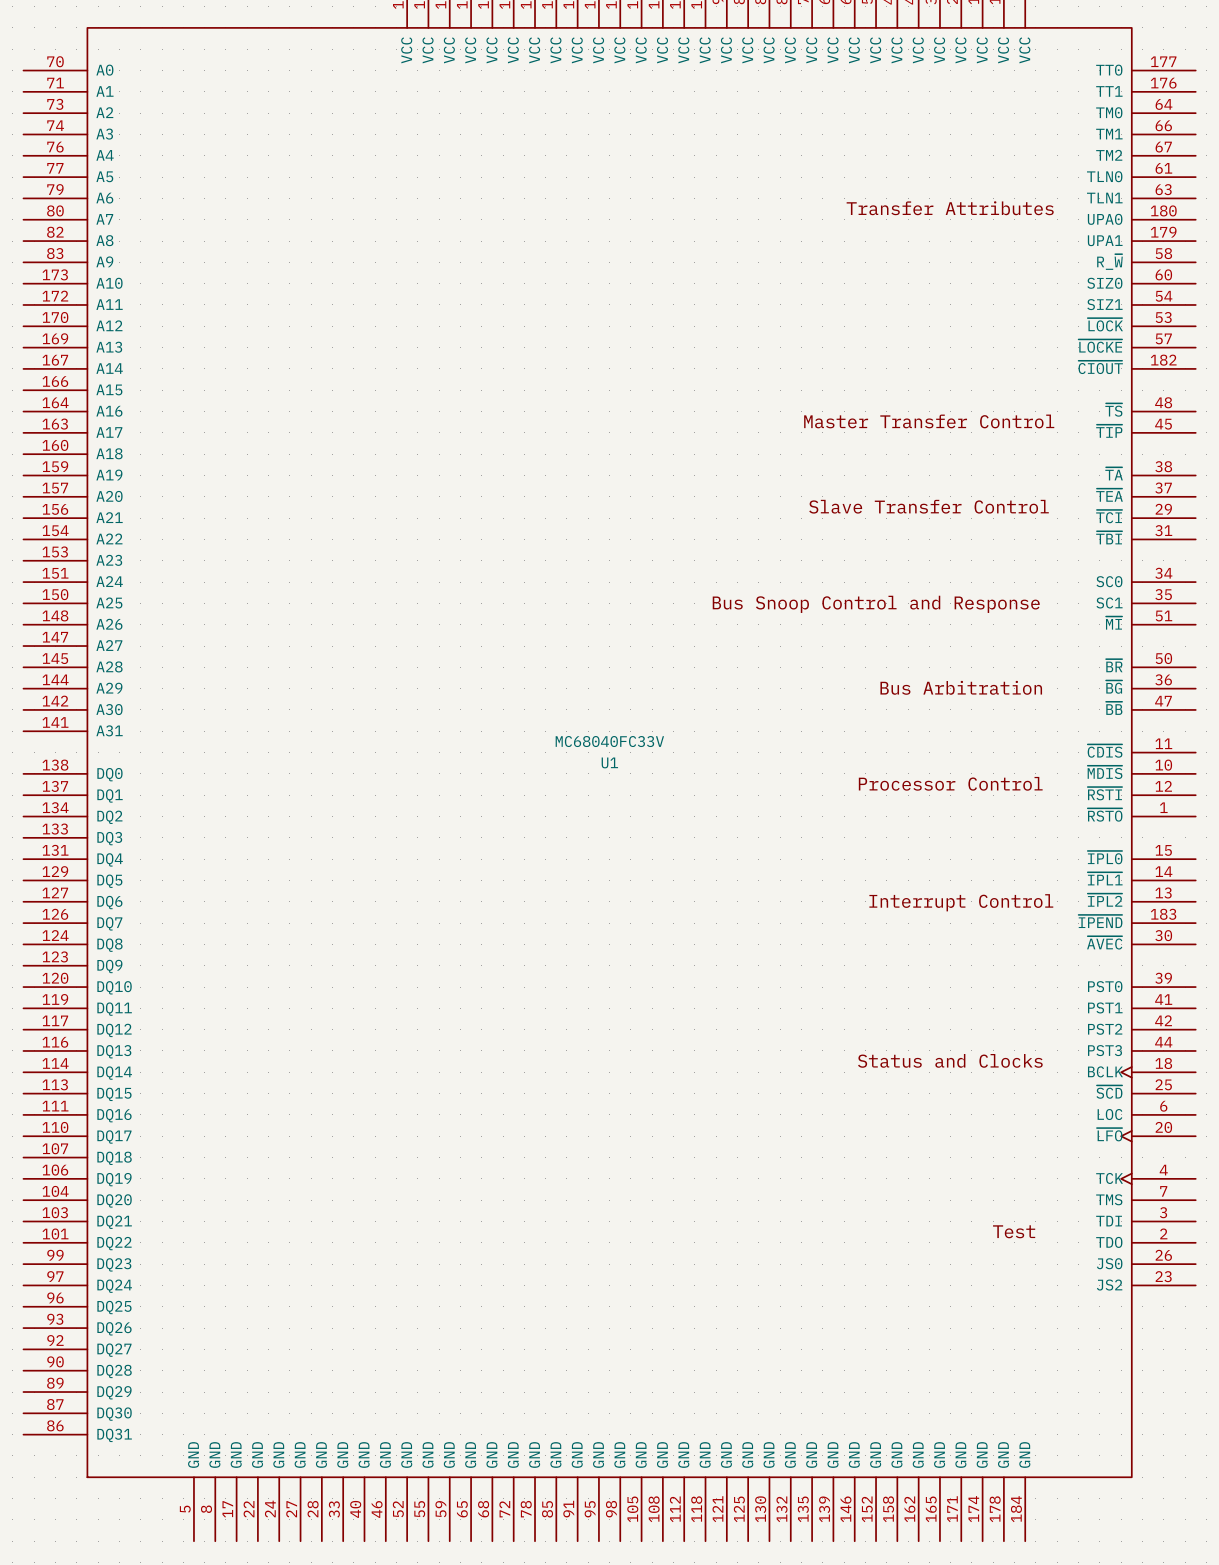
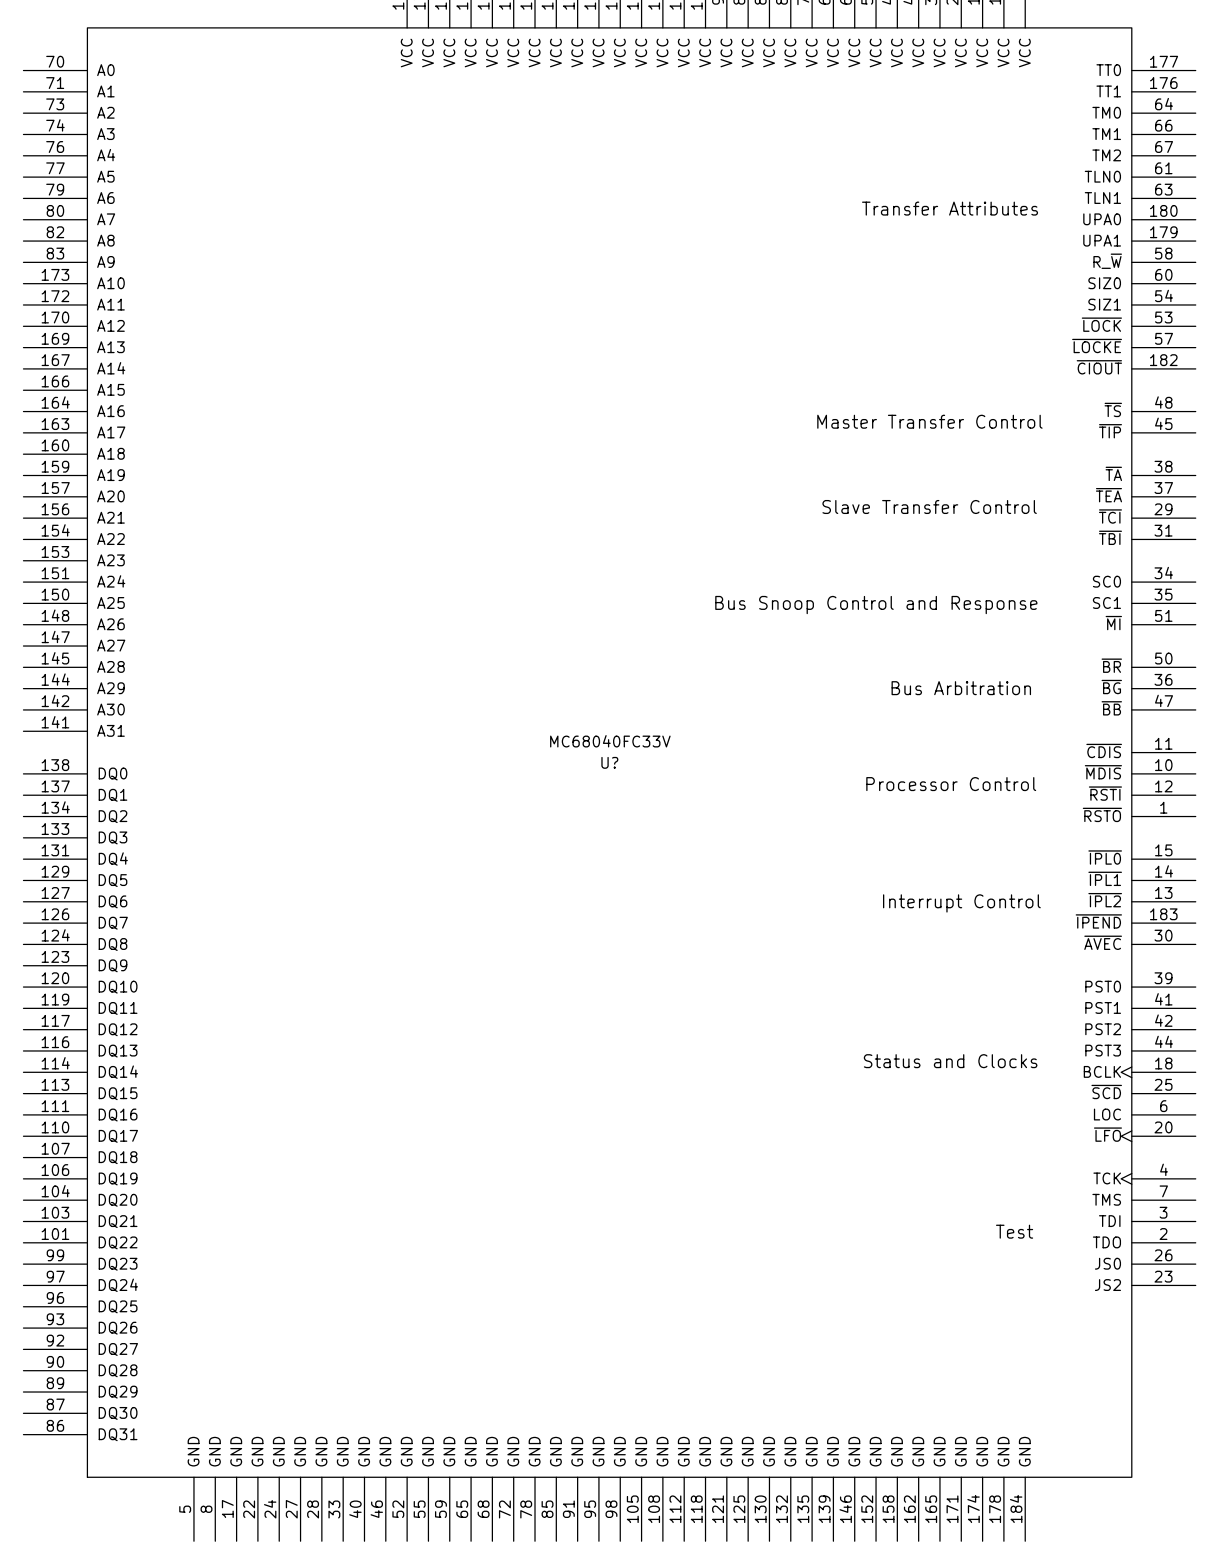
U1 name: U1 (609, 762) -> U? (609, 762)

